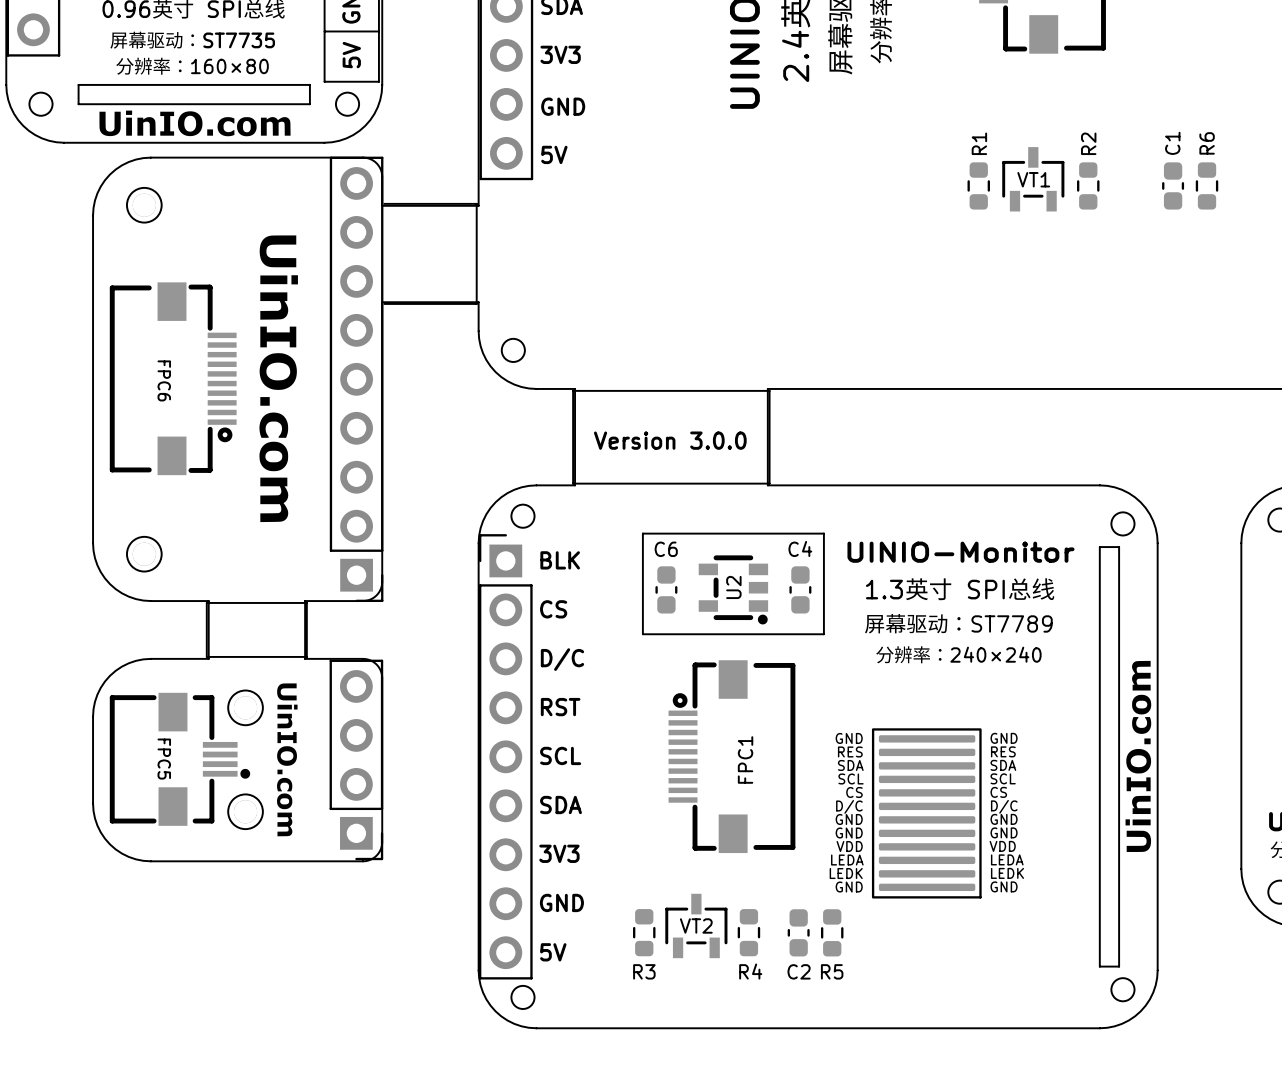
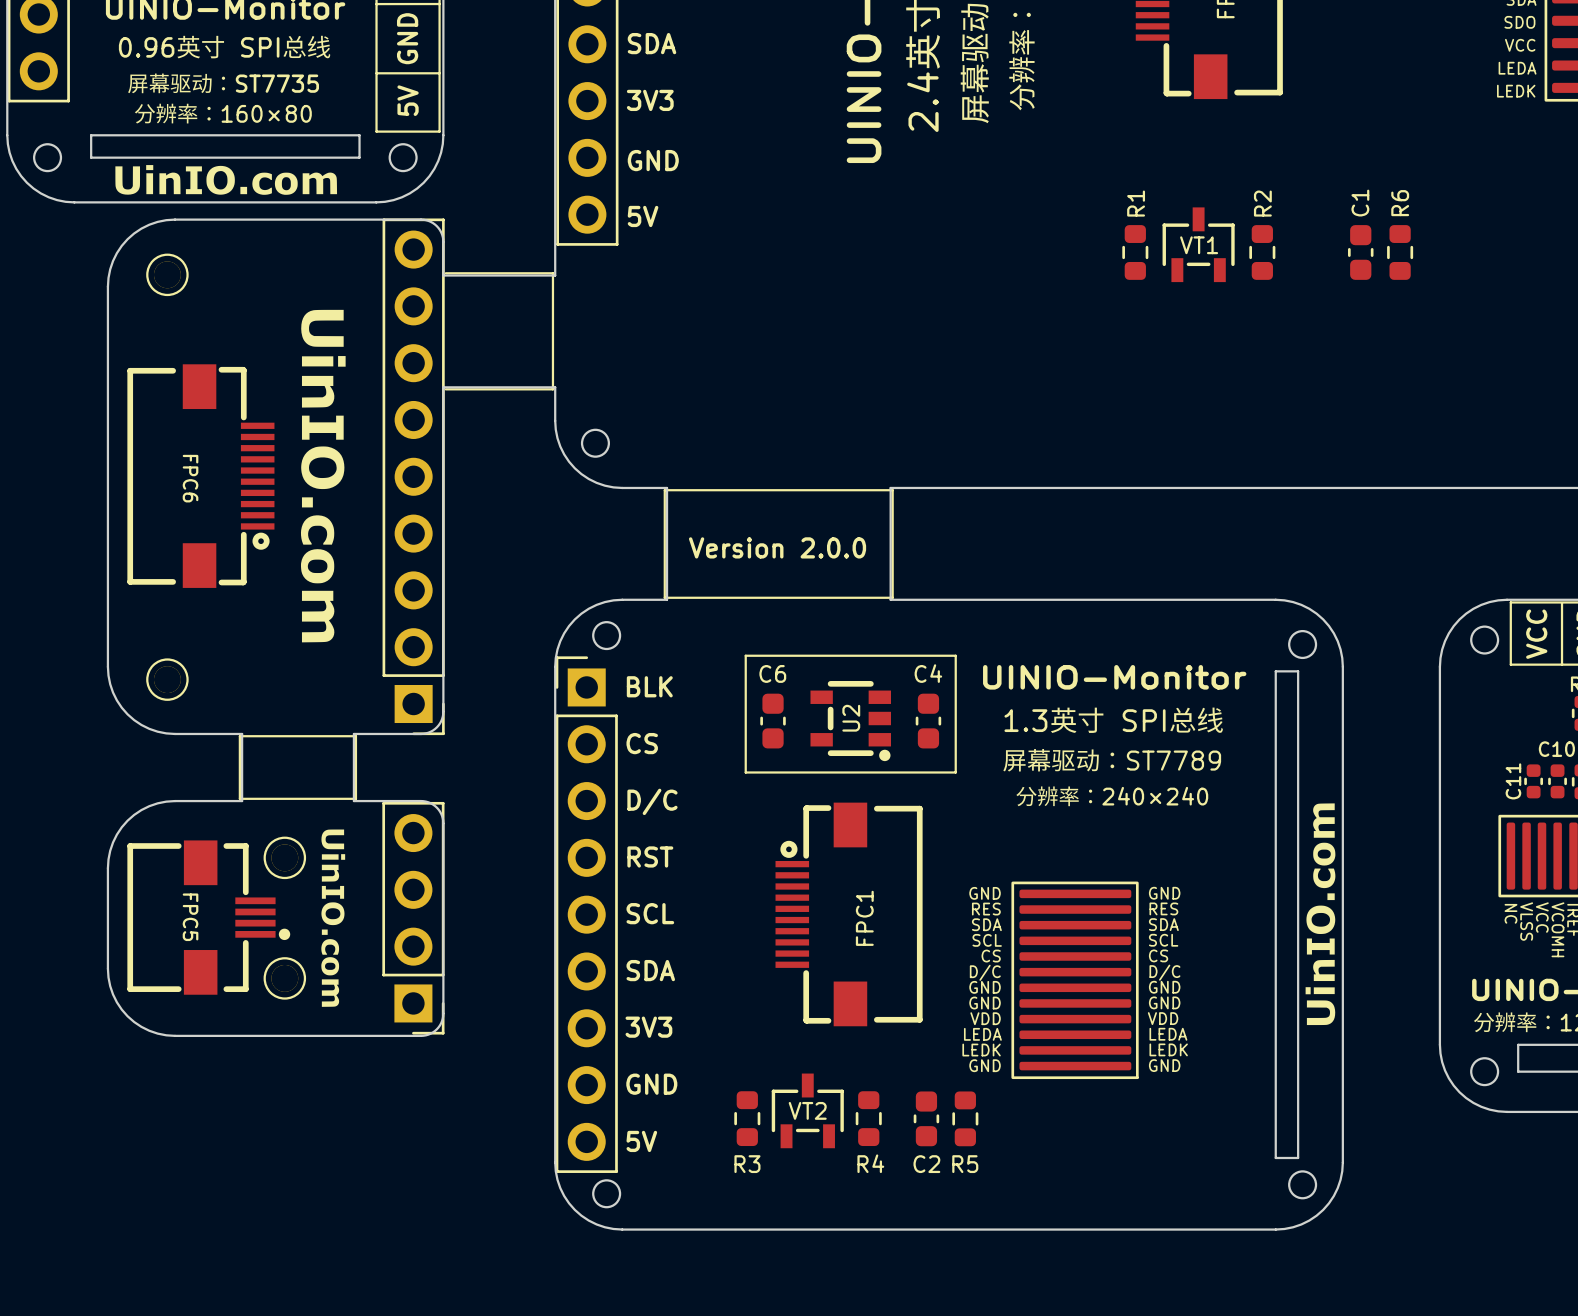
text: Version 3.0.0 (670, 440) -> Version 2.0.0 (777, 547)

